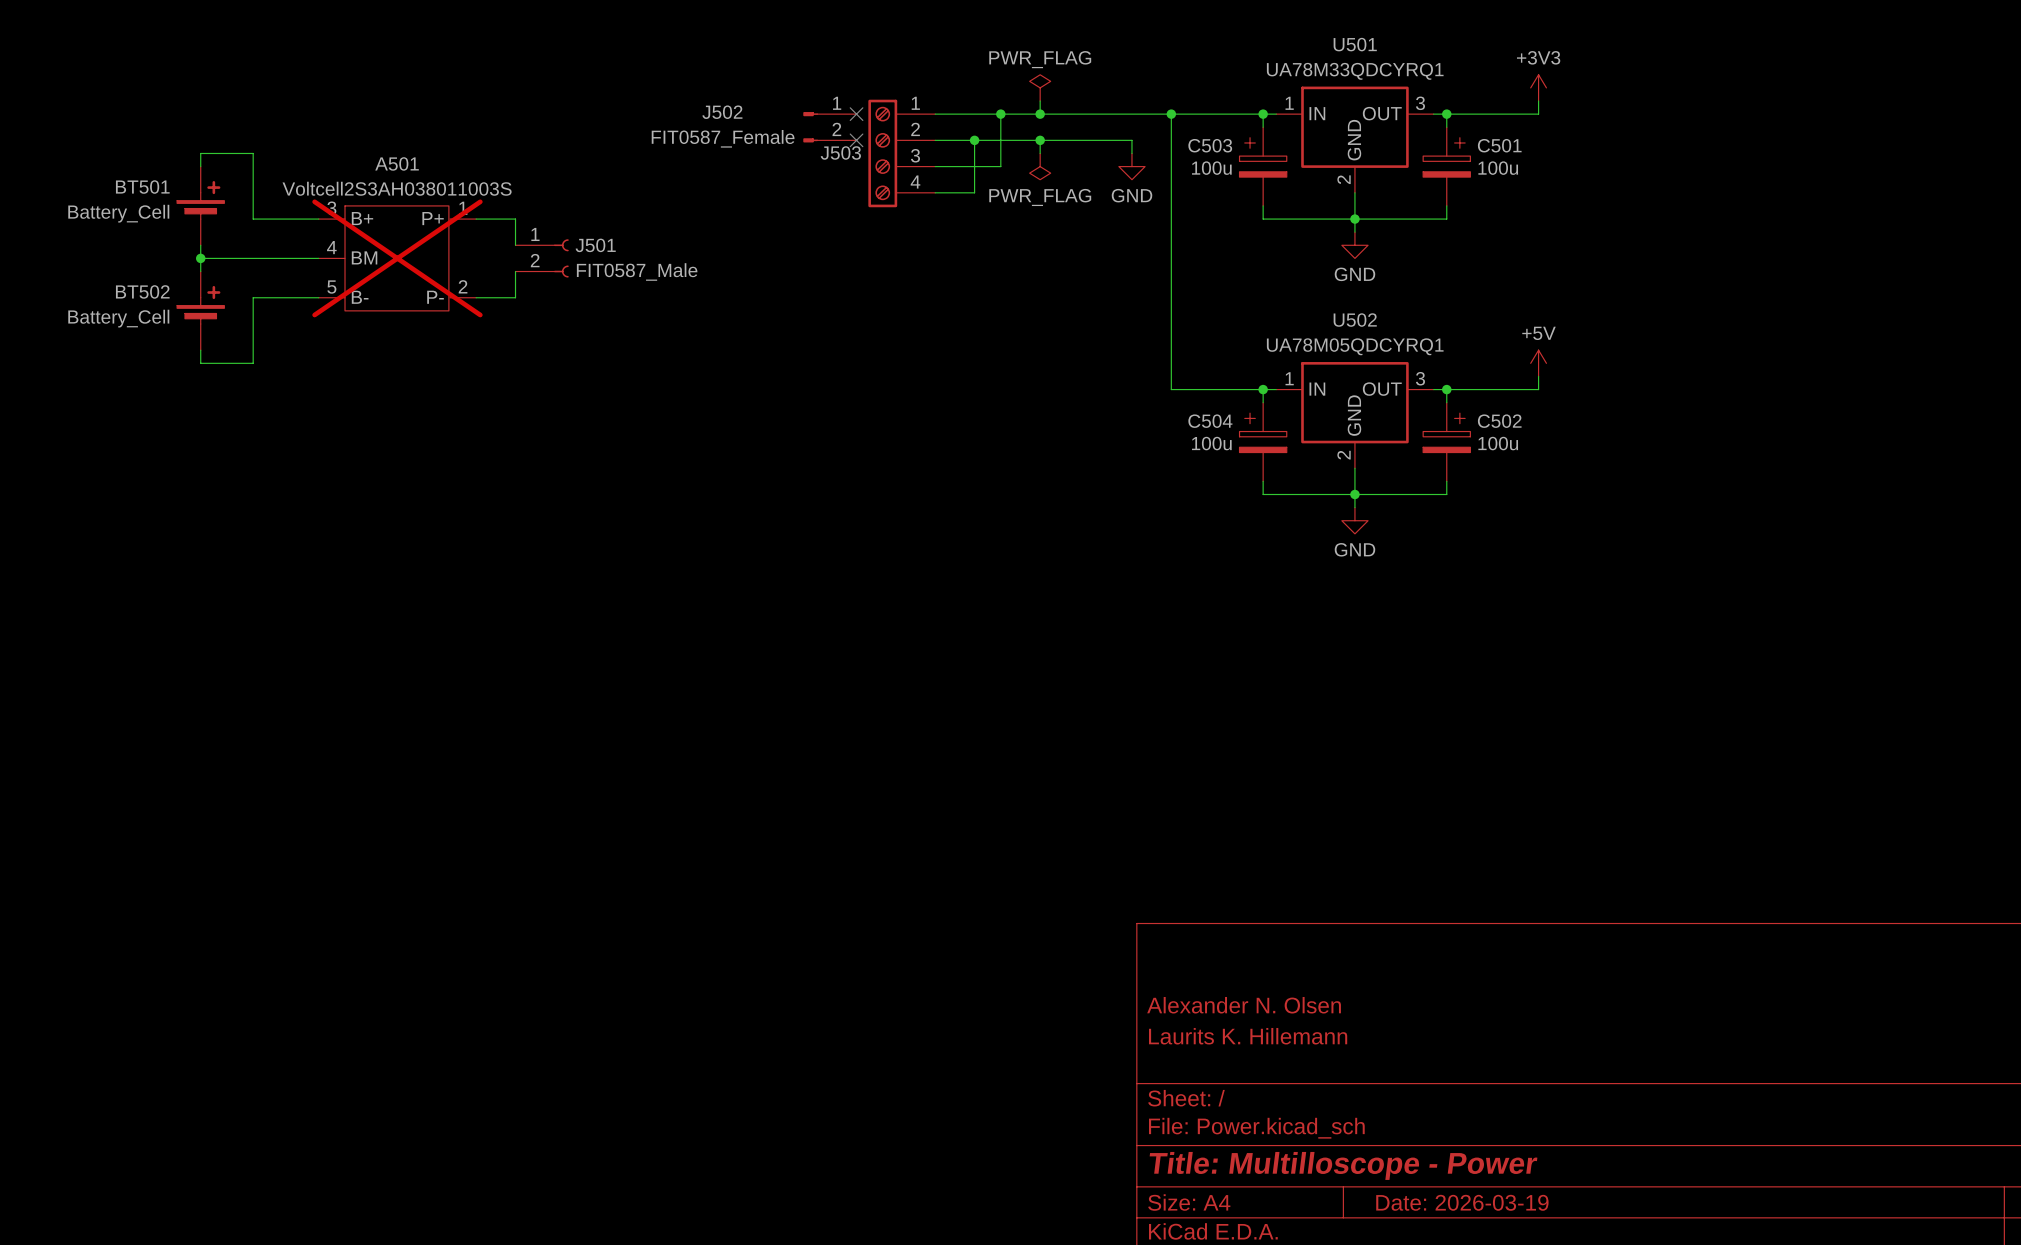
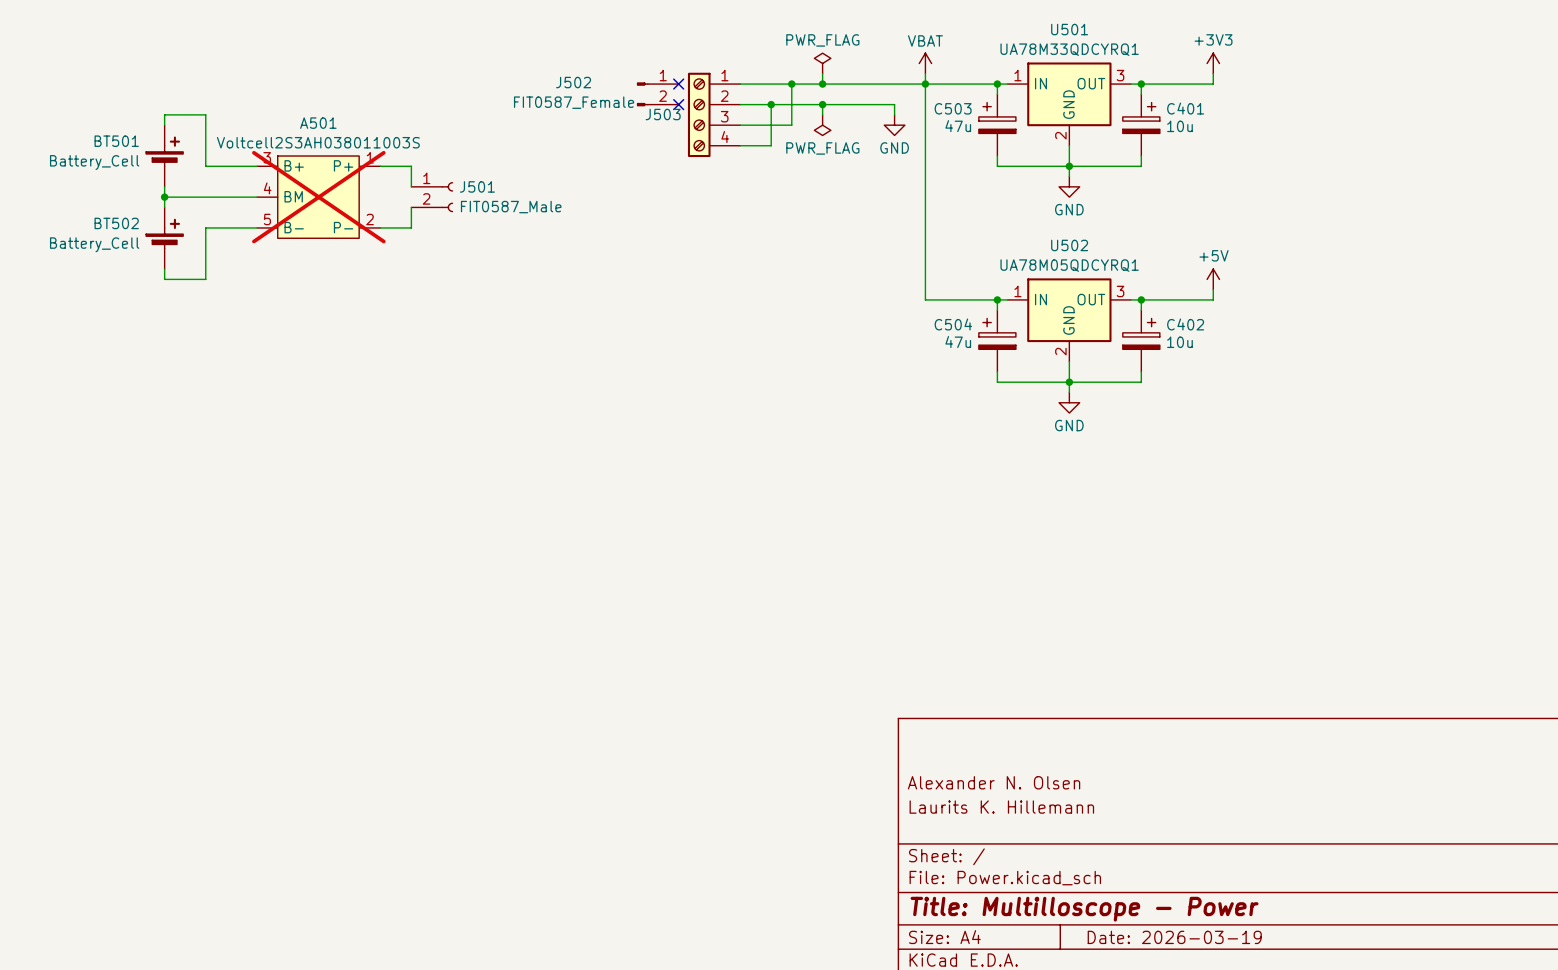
power symbol: none -> VBAT (925, 63)
wire: none -> (925, 73) (925, 84)
C501 name: C501 (1499, 145) -> C401 (1185, 108)
C503 value: 100u (1211, 168) -> 47u (958, 126)
C501 value: 100u (1498, 168) -> 10u (1179, 126)
C502 name: C502 (1499, 421) -> C402 (1185, 324)
C504 value: 100u (1211, 443) -> 47u (958, 342)
C502 value: 100u (1498, 443) -> 10u (1179, 342)

